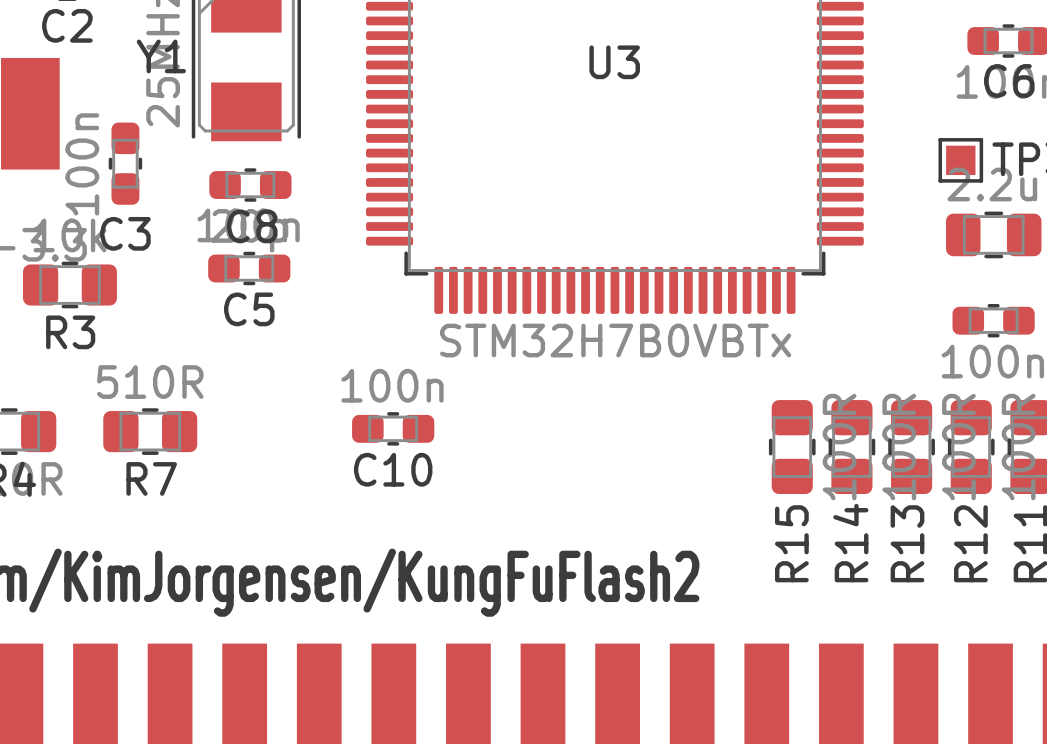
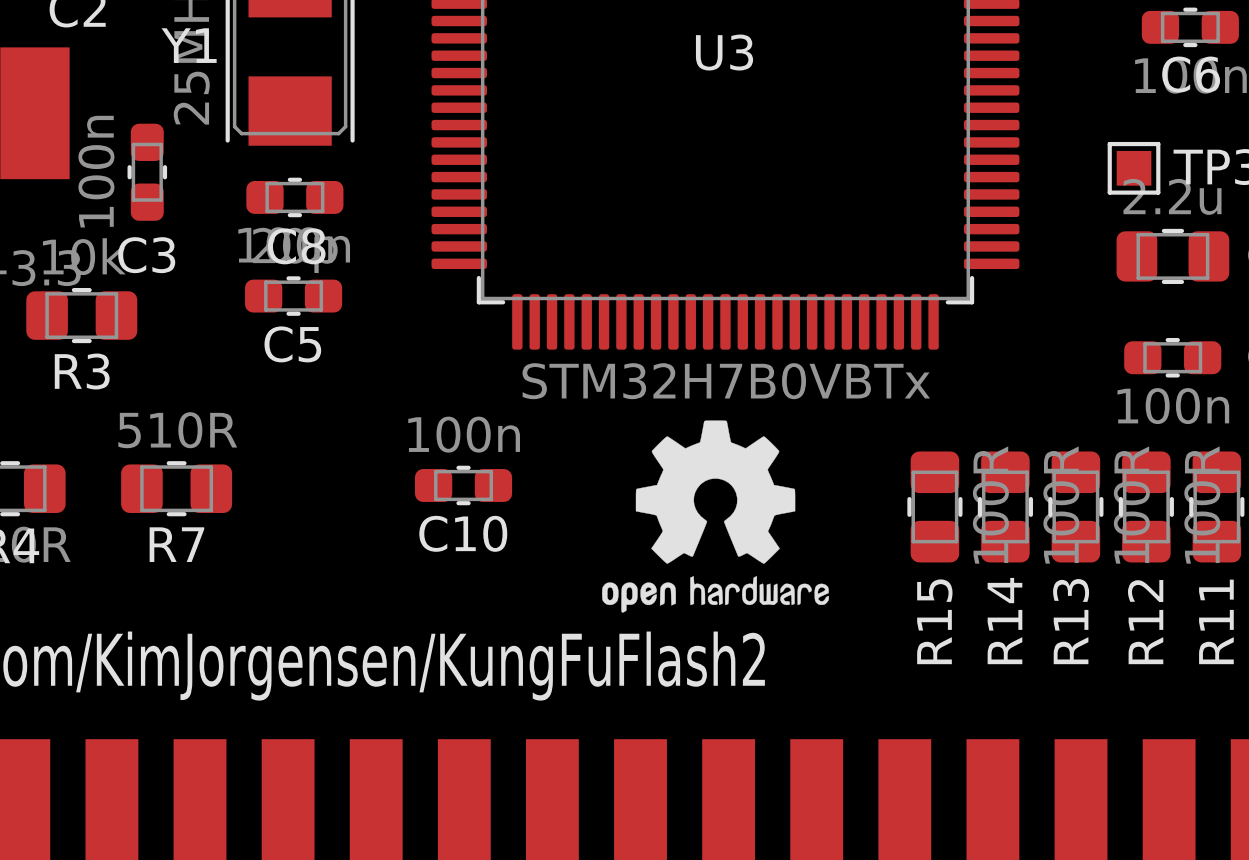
drawing: none -> [602, 420, 829, 613]

